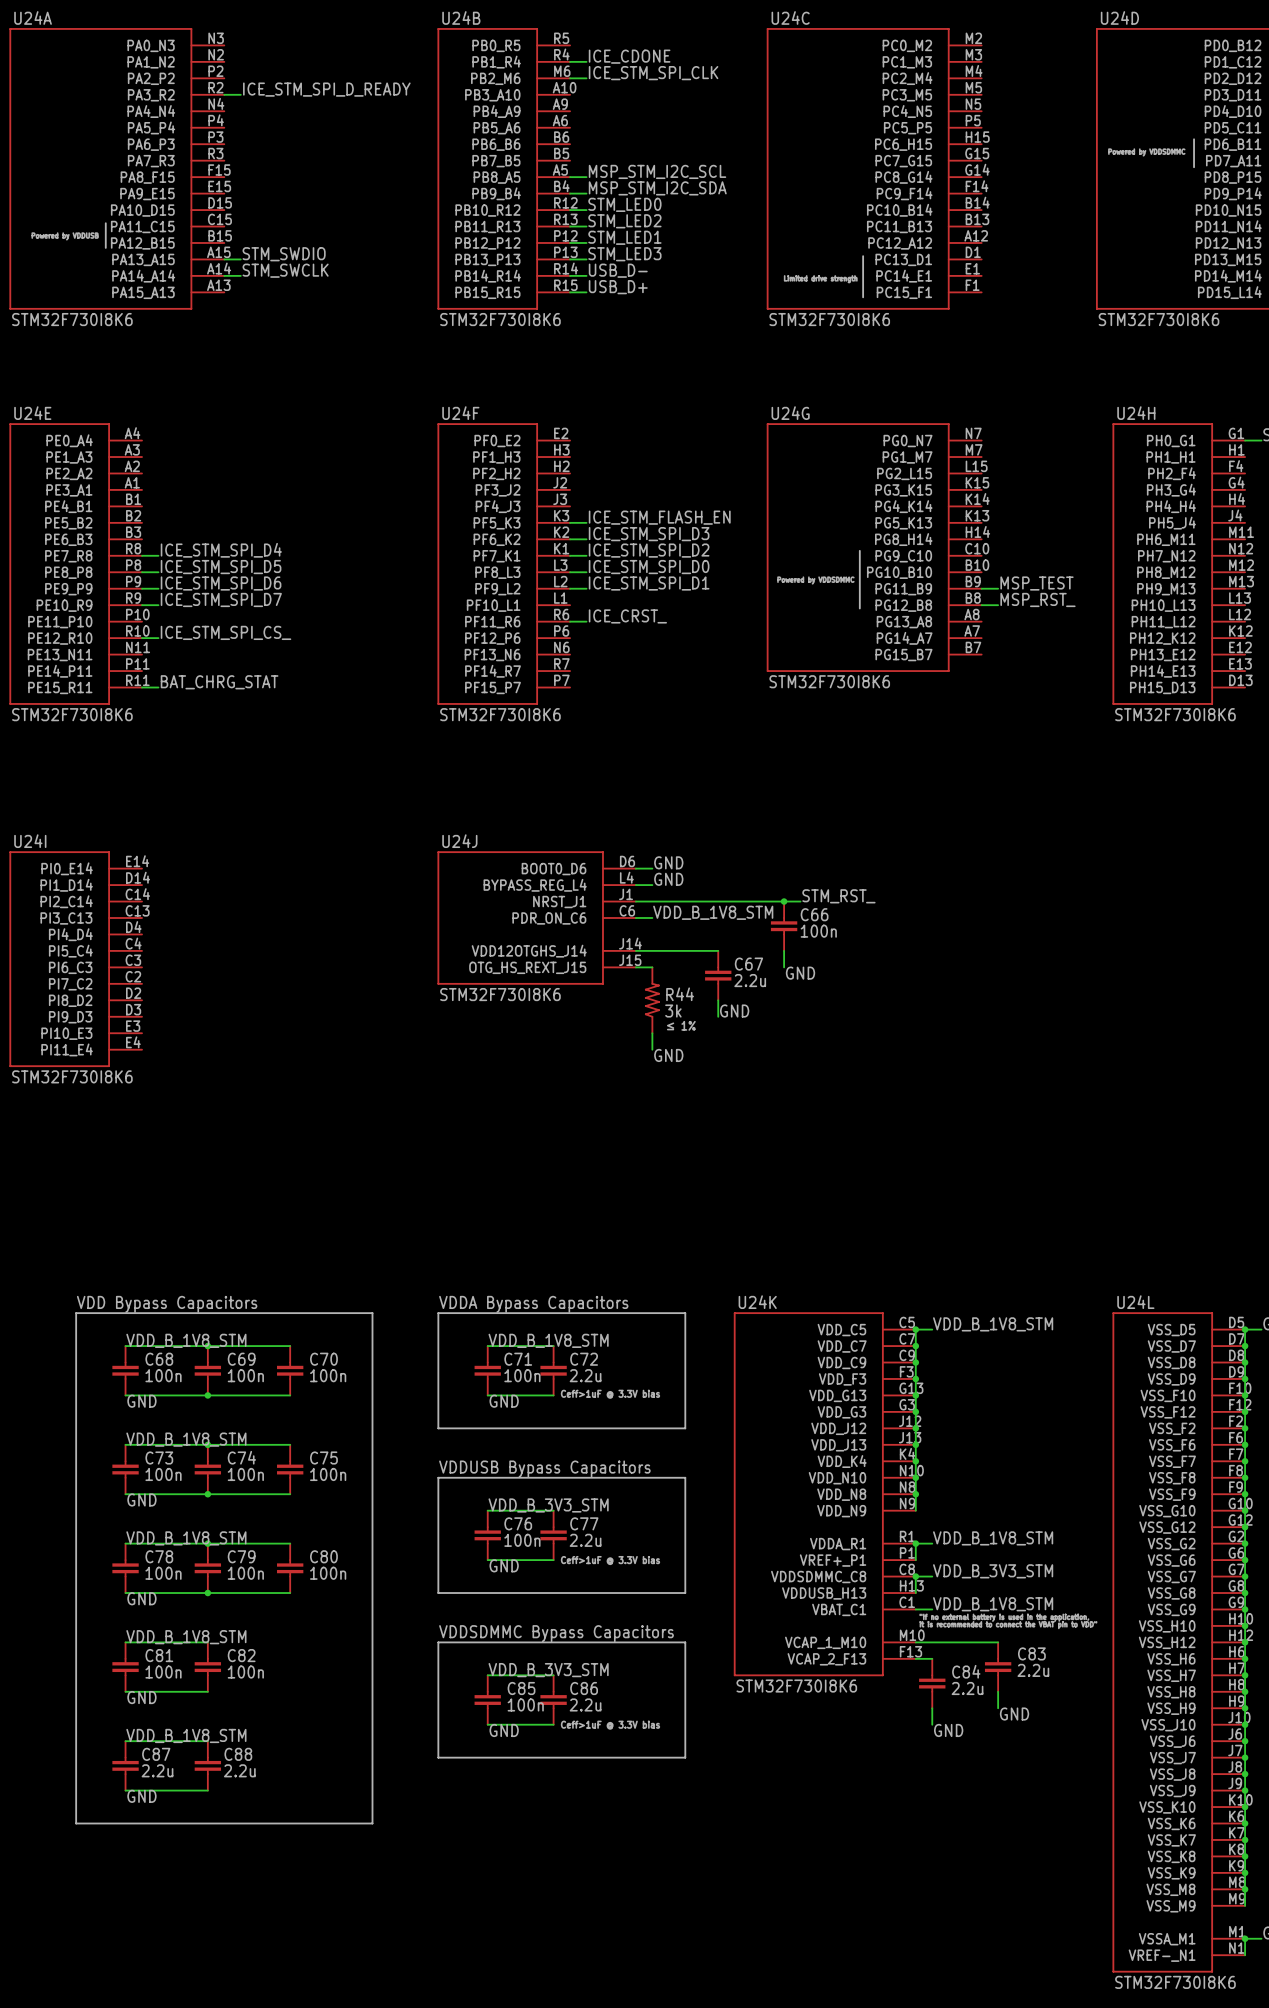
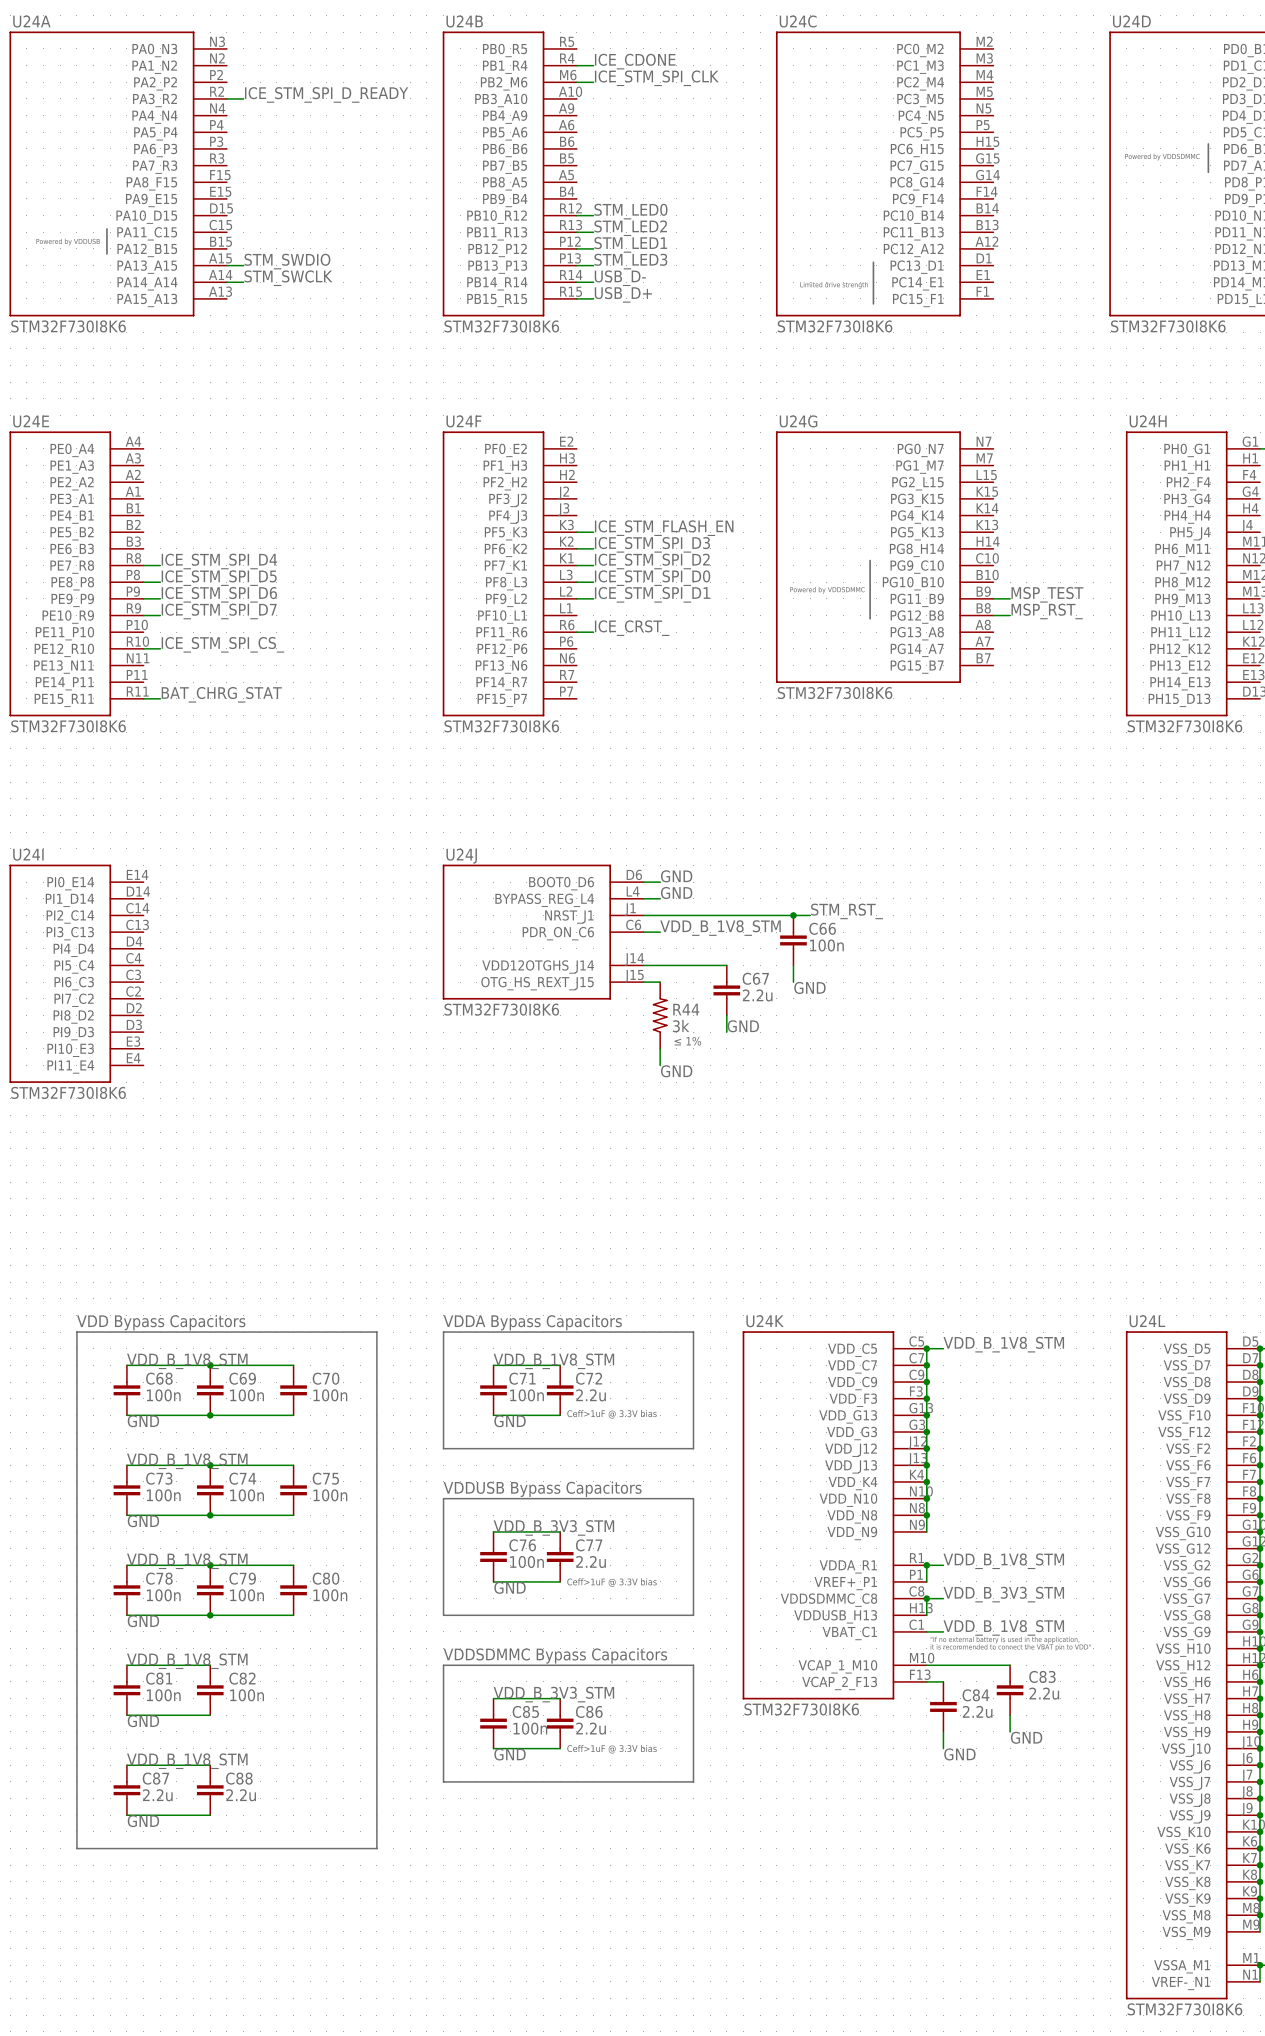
label: MSP_STM_I2C_SCL (657, 171) -> none
wire: (570, 177) (586, 177) -> none
label: MSP_STM_I2C_SDA (657, 188) -> none
wire: (570, 193) (586, 193) -> none

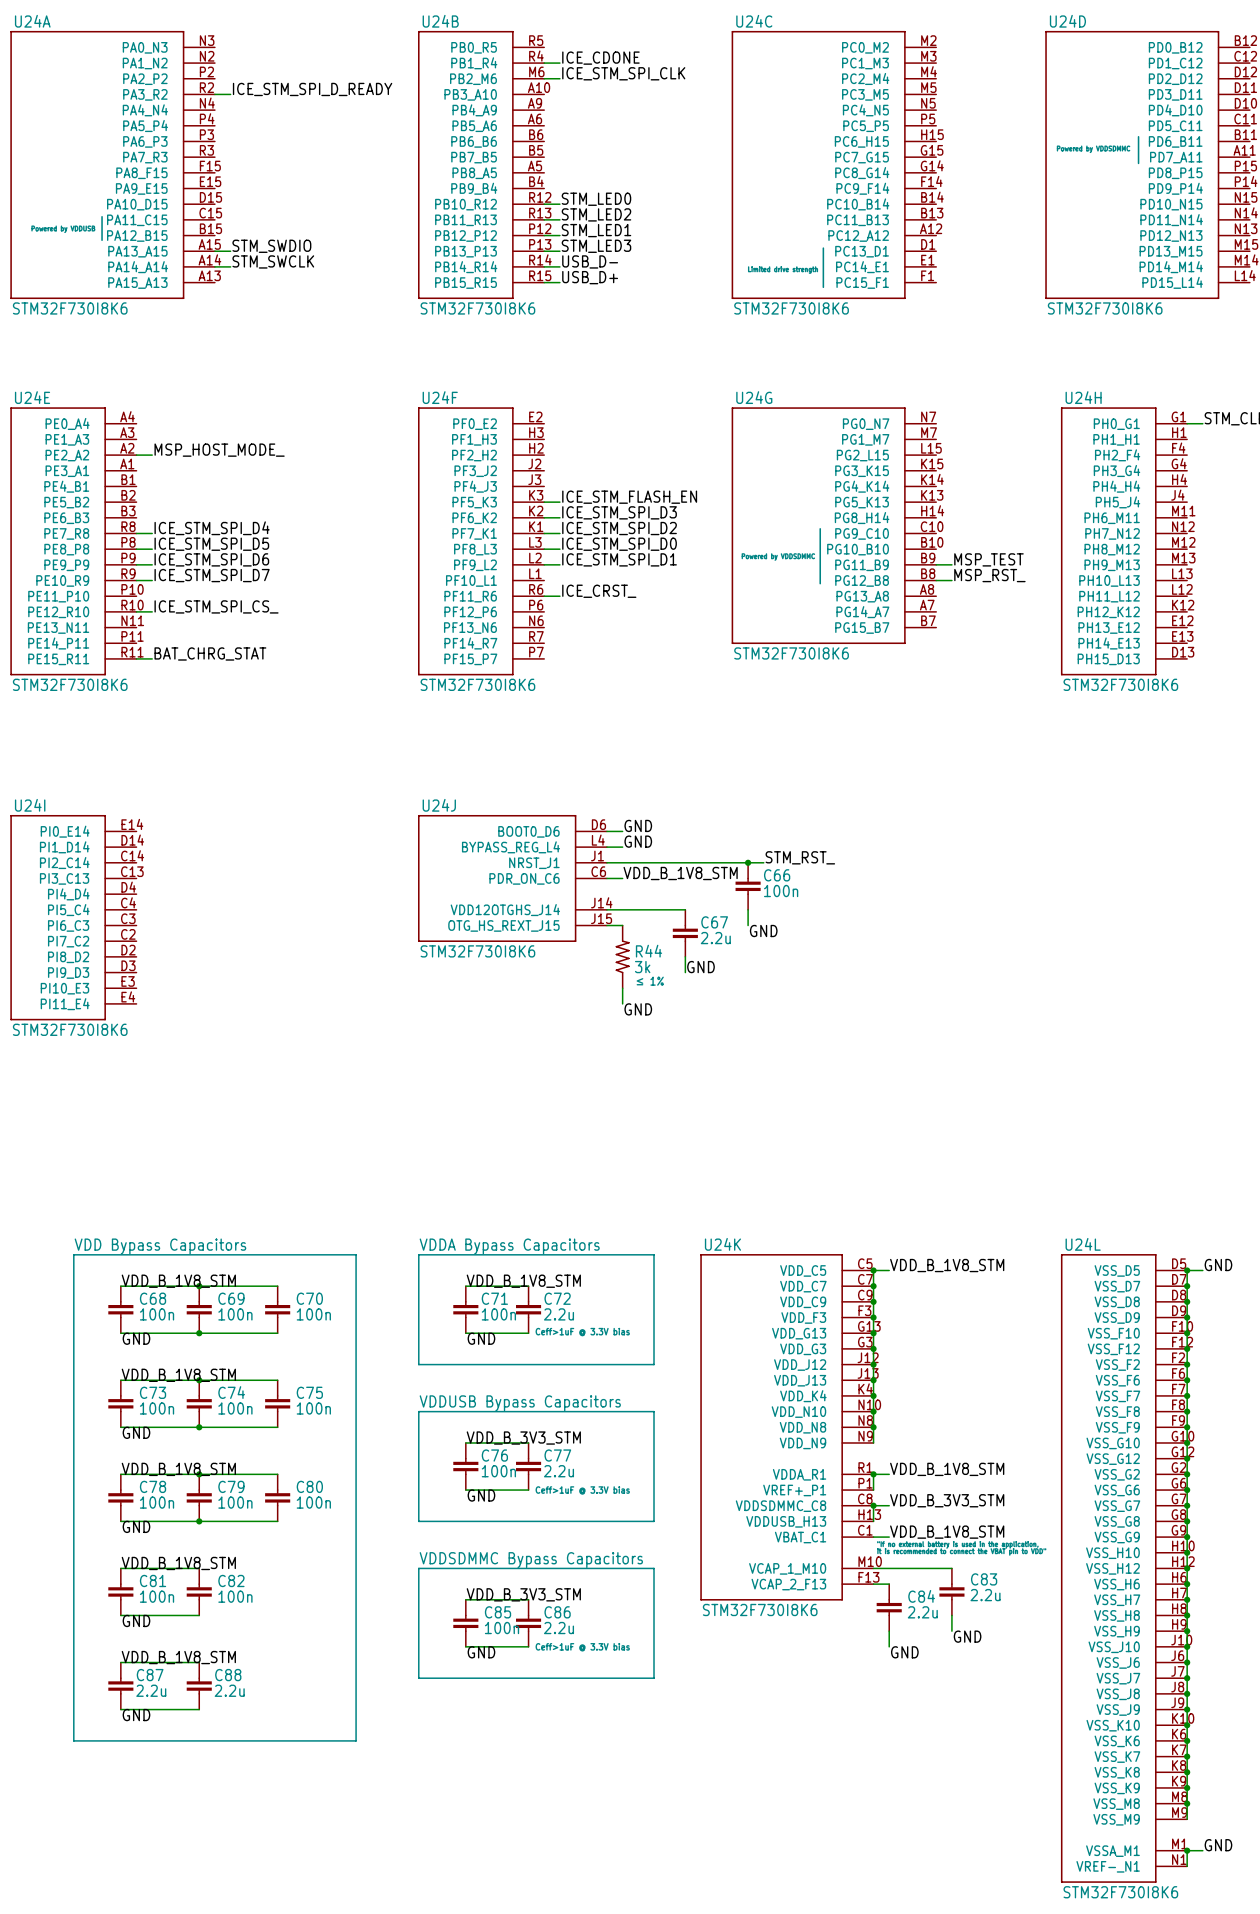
label: none -> MSP_HOST_MODE_ (219, 450)
wire: none -> (136, 455) (152, 455)

